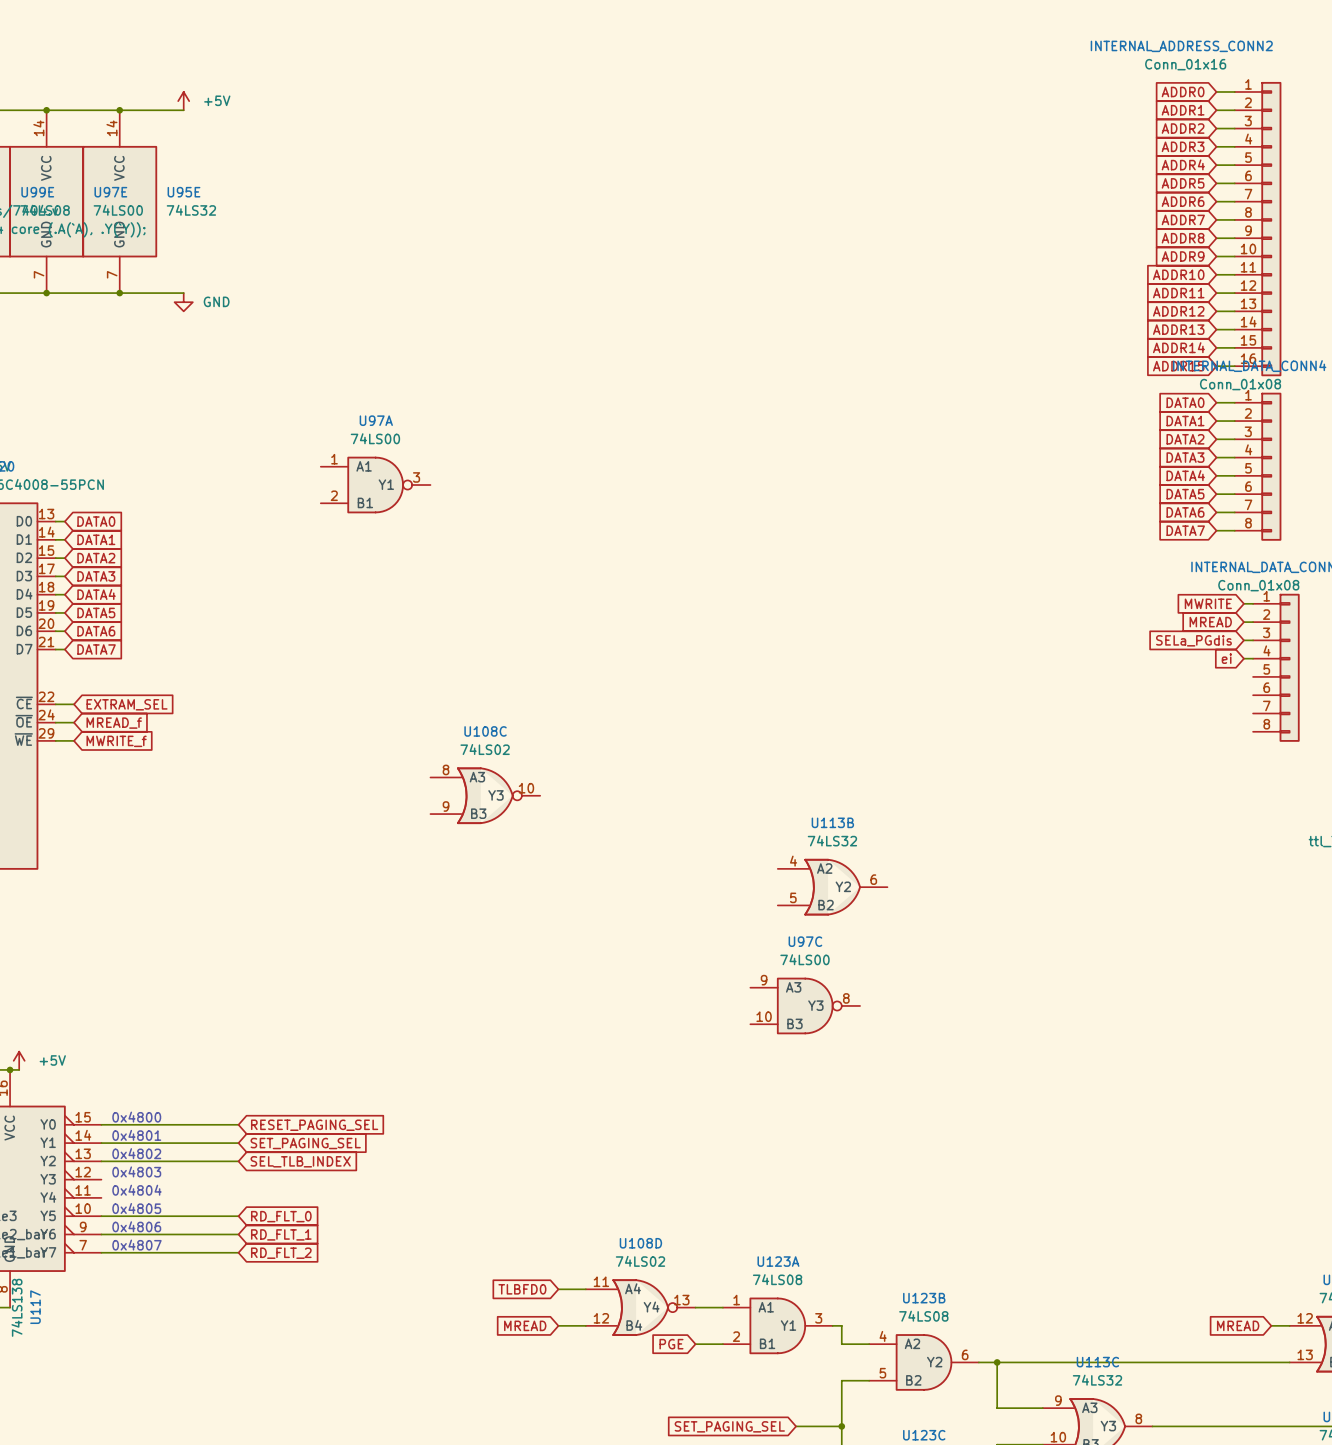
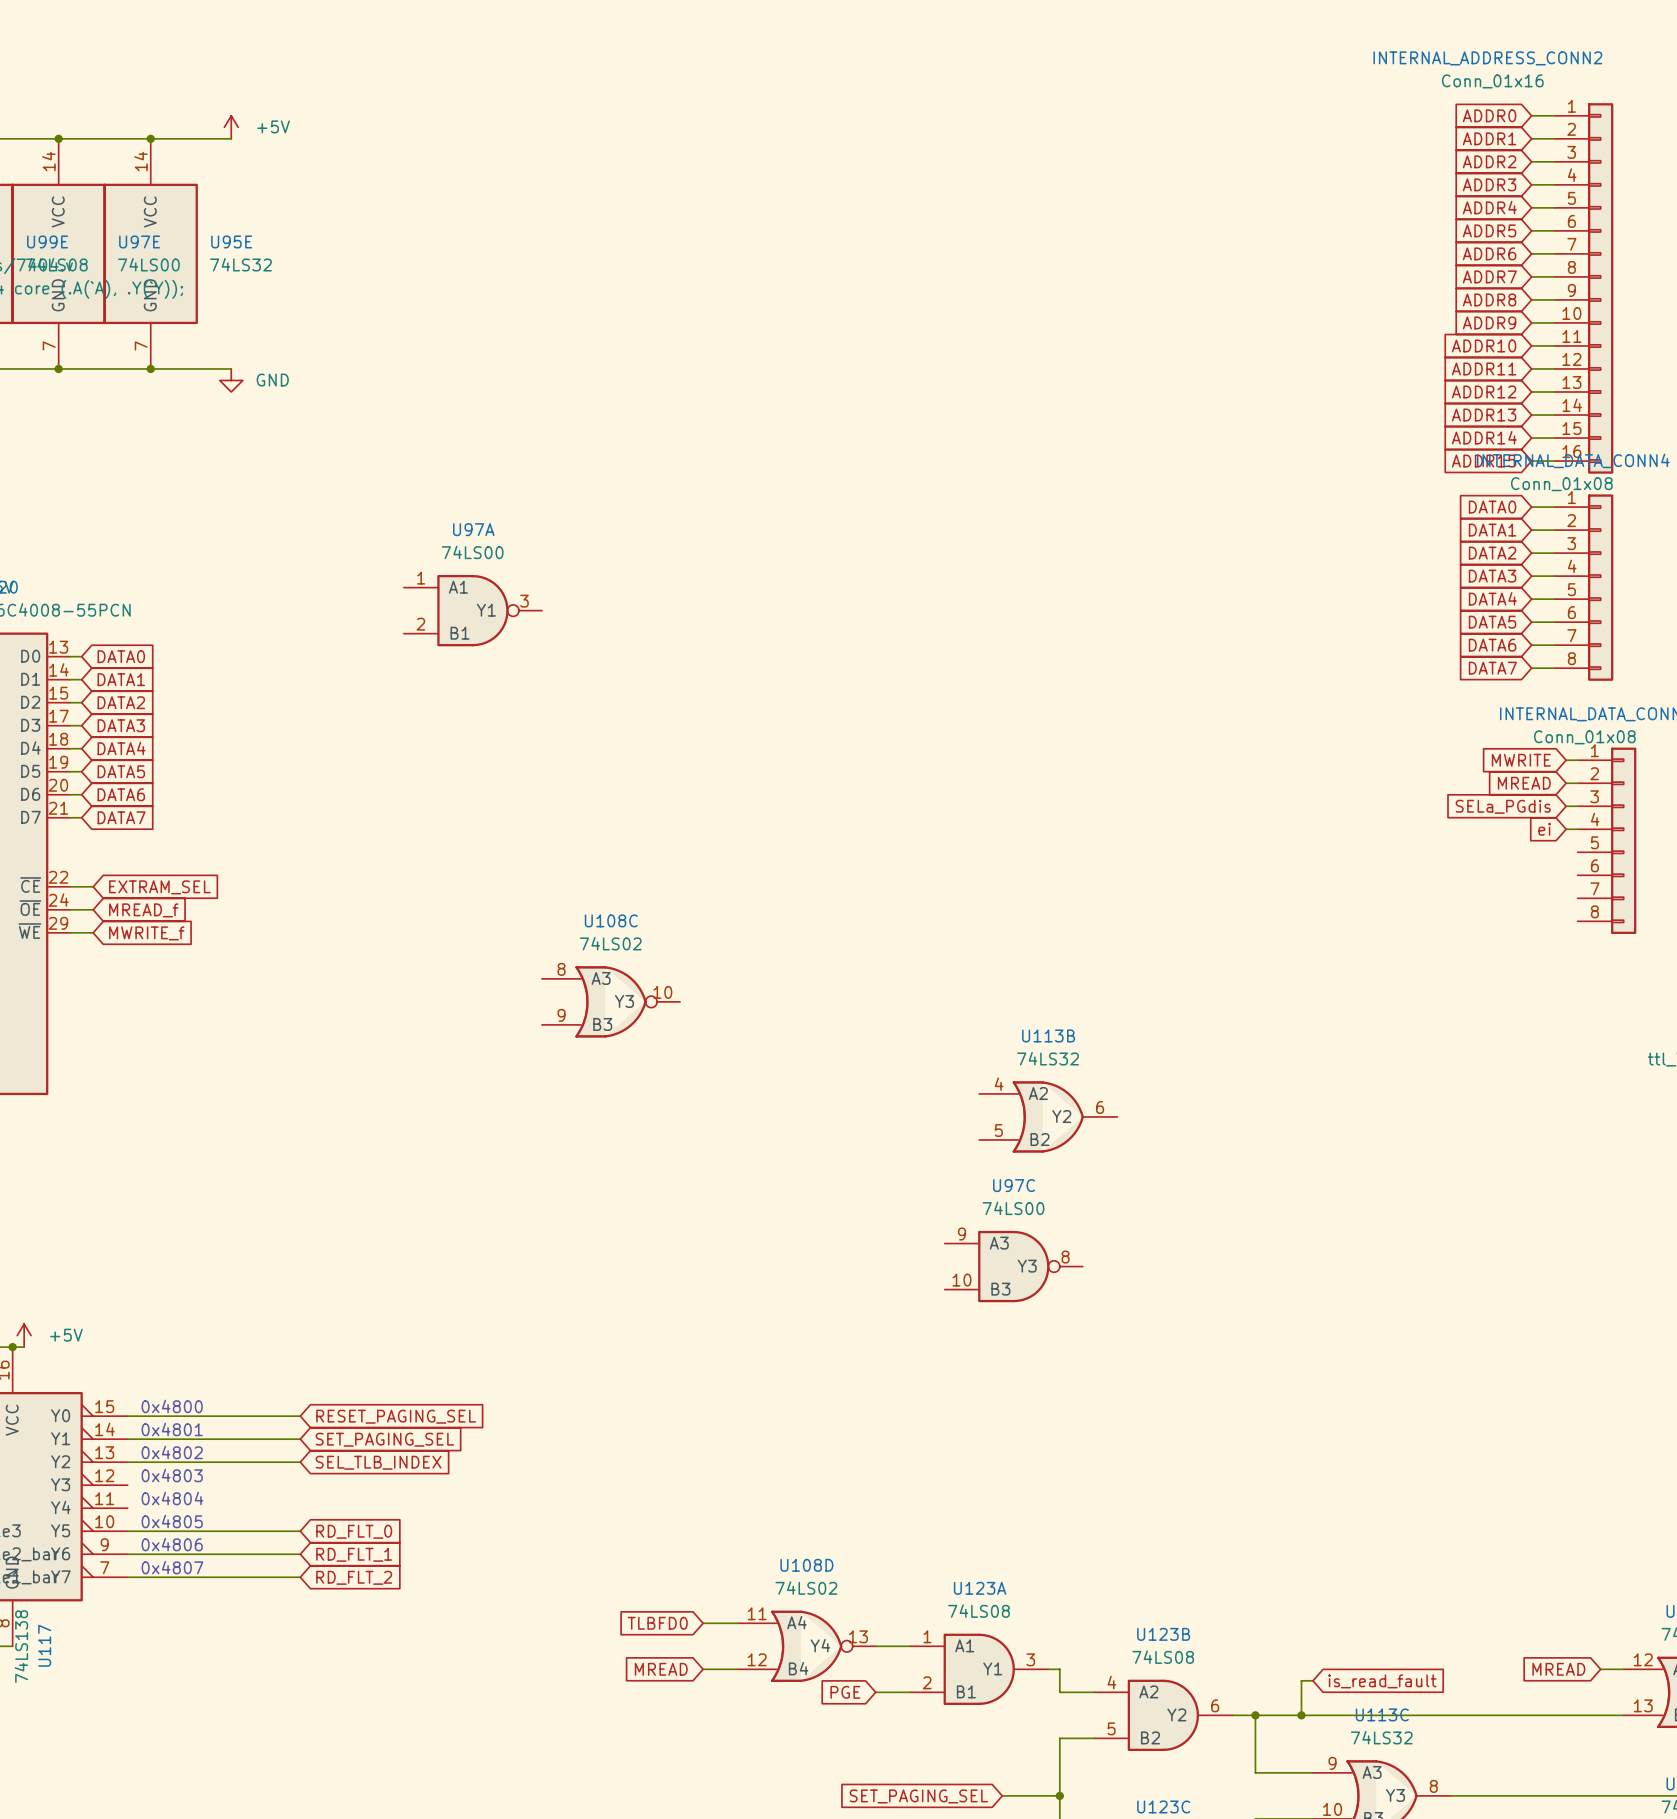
wire: none -> (1312, 1680) (1301, 1680) (1301, 1715)
global label: none -> is_read_fault (1382, 1681)
junction: none -> (1301, 1715)

